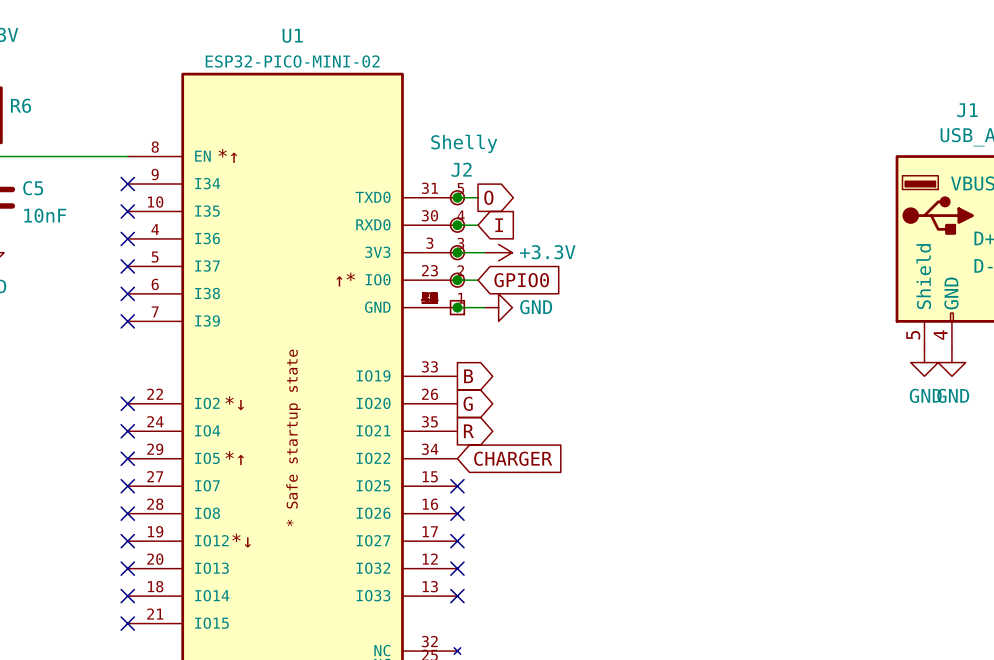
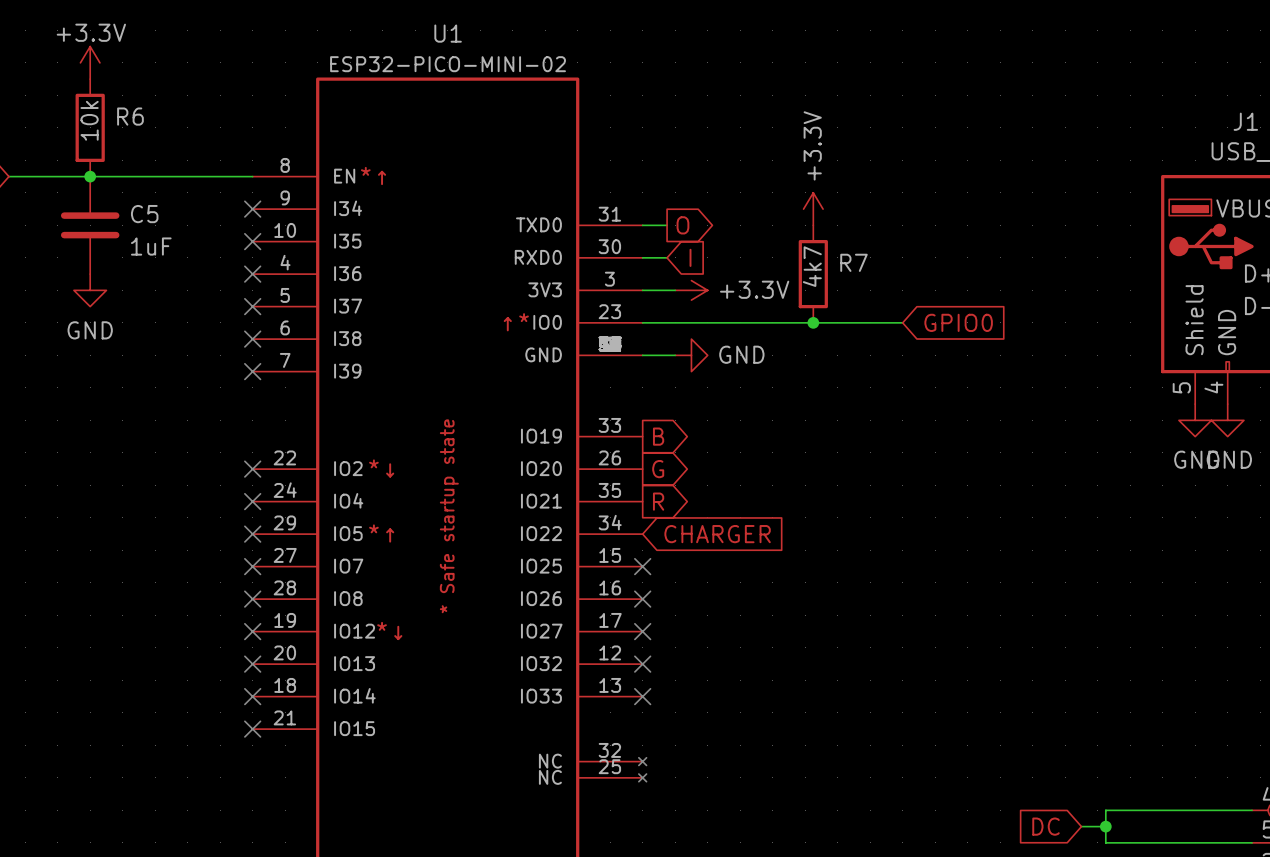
power symbol: none -> +3.3V (813, 209)
junction: (457, 197) -> none
C5 value: 10nF (45, 215) -> 1uF (151, 246)
junction: (457, 225) -> none
R7: none -> 4k7 (813, 274)
junction: (457, 252) -> none
J2: Shelly (457, 252) -> none
junction: (457, 280) -> none
wire: none -> (667, 322) (902, 322)
global label position: GPIO0 (521, 280) -> GPIO0 (958, 322)
junction: none -> (813, 322)
junction: (457, 307) -> none

